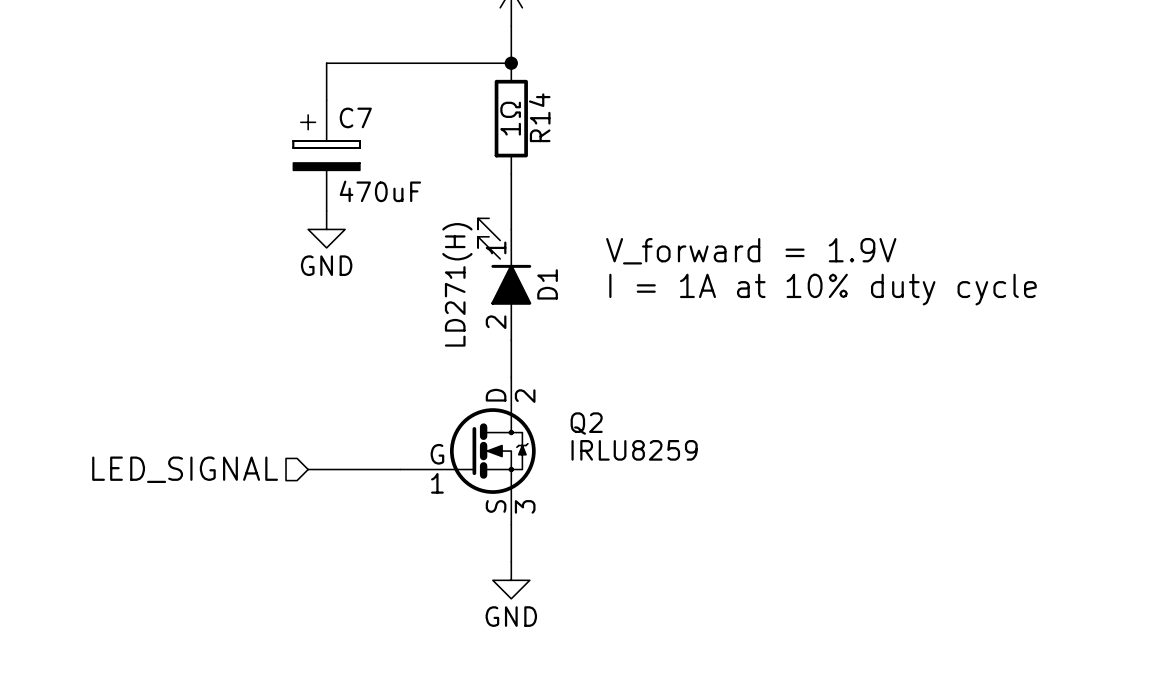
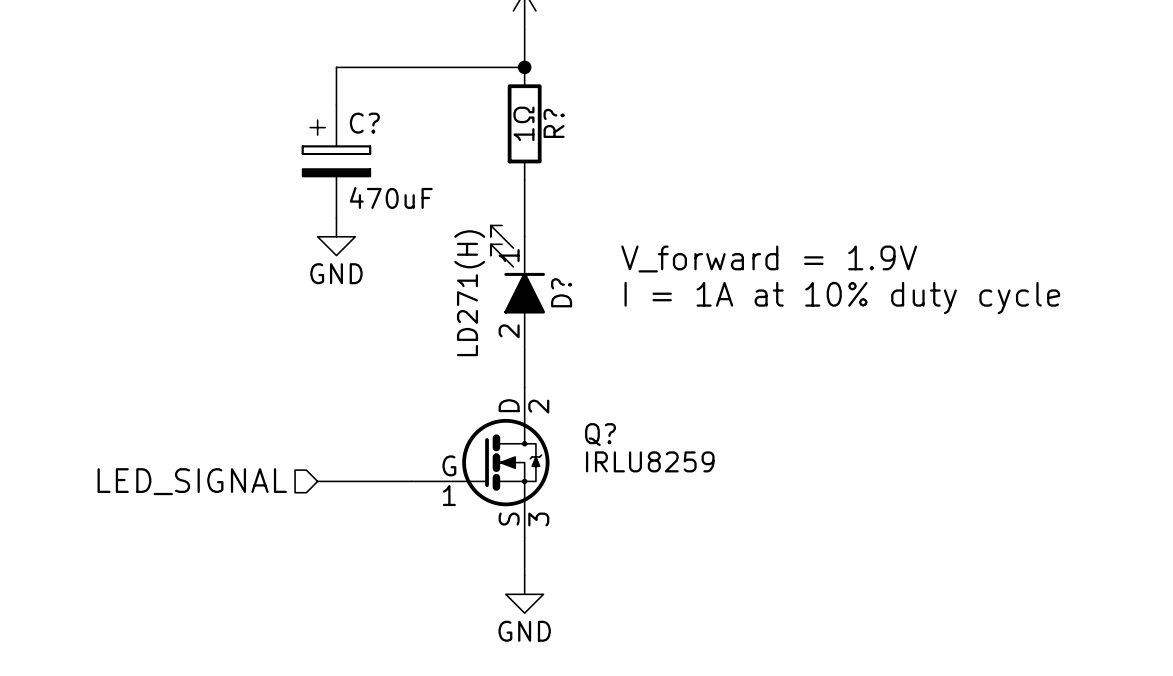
C7 name: C7 (355, 117) -> C? (364, 123)
R14 name: R14 (539, 117) -> R? (554, 123)
D1 name: D1 (547, 284) -> D? (561, 292)
Q2 name: Q2 (586, 423) -> Q? (600, 434)

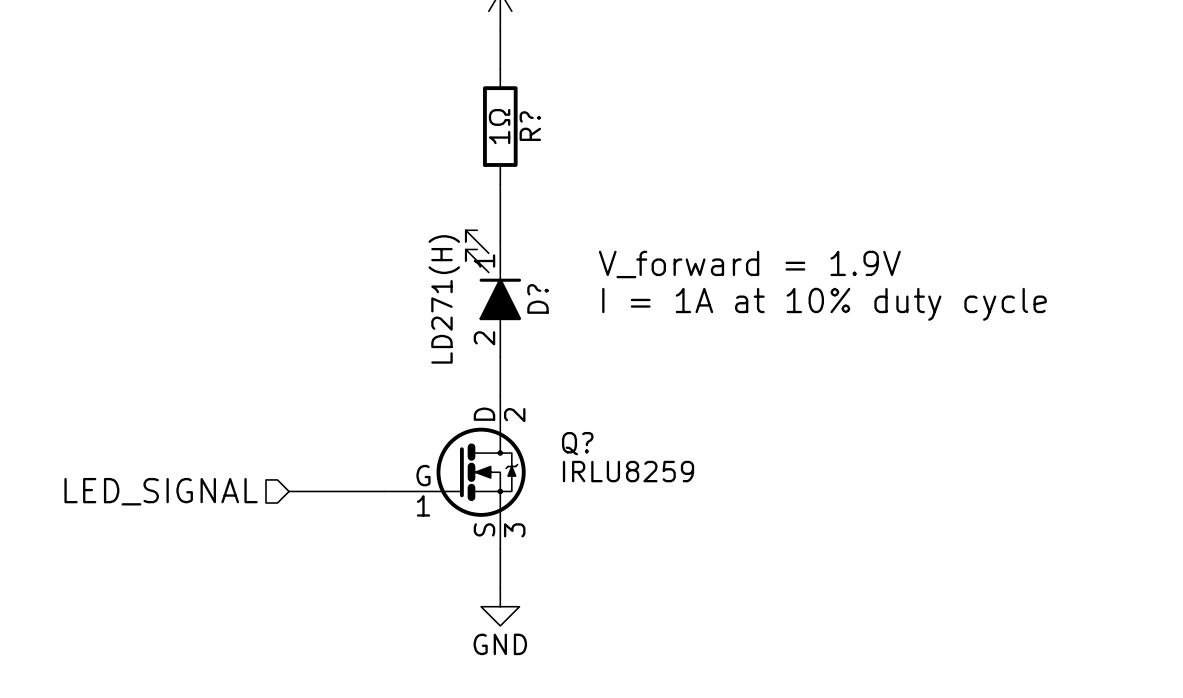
wire: (524, 67) (336, 67) (336, 105) -> none
junction: (524, 67) -> none
C?: 470uF (336, 161) -> none
power symbol: GND (336, 236) -> none

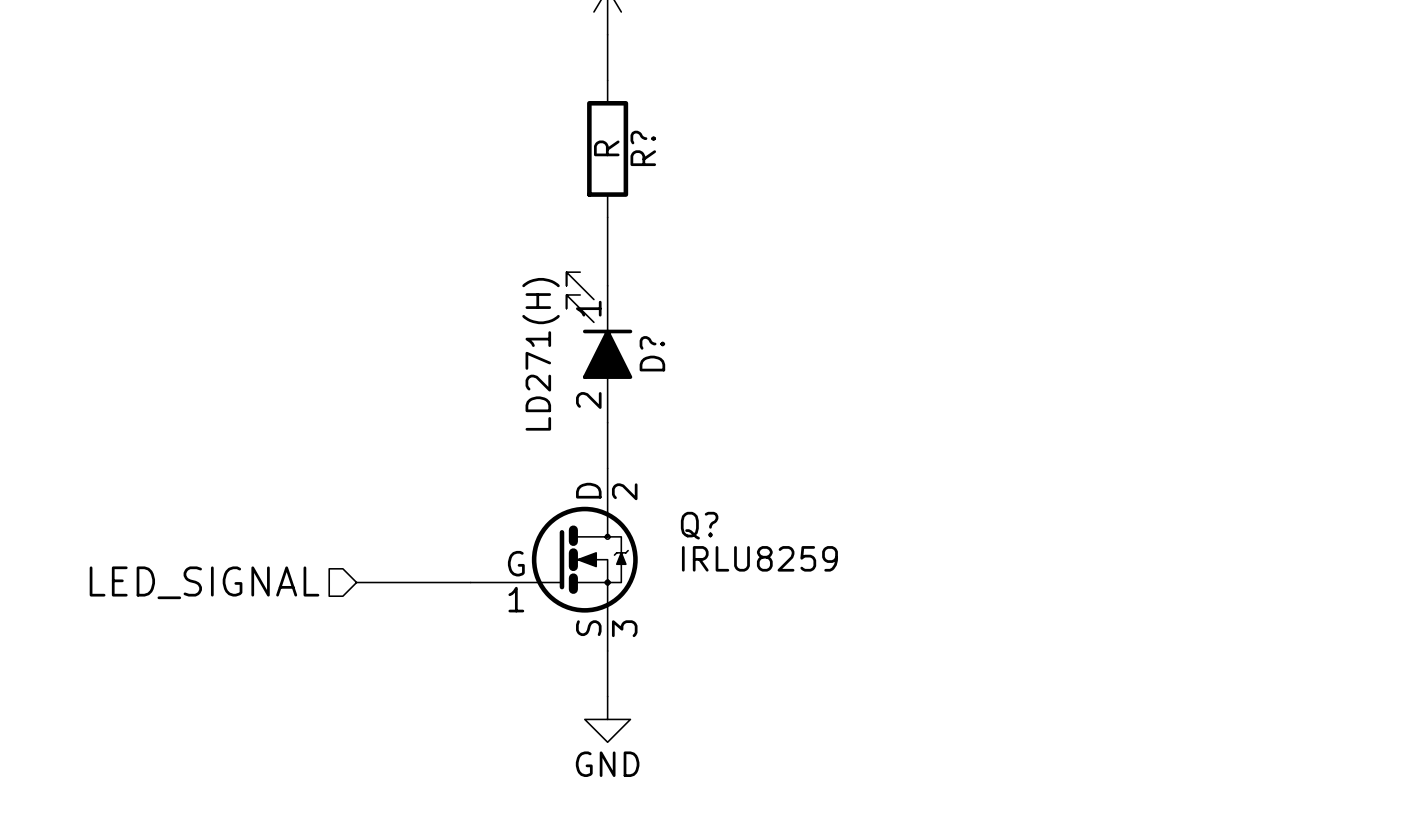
R? value: 1Ω (499, 126) -> R (606, 148)
text: V_forward = 1.9V (749, 264) -> none
text: I = 1A at 10% duty cycle (824, 304) -> none

